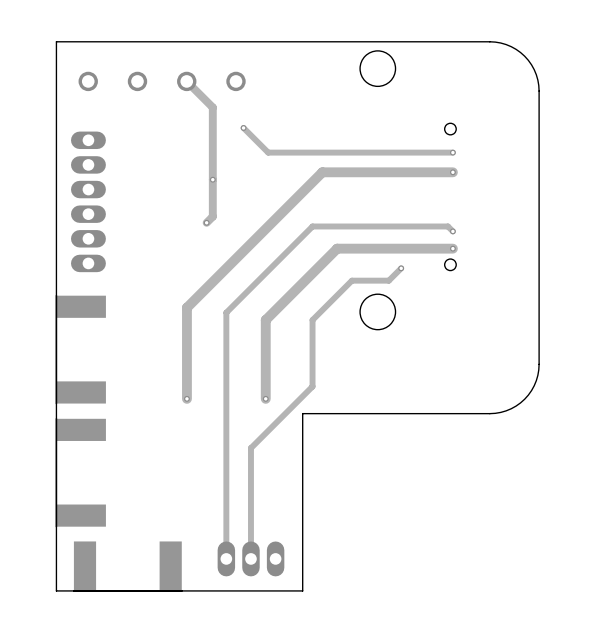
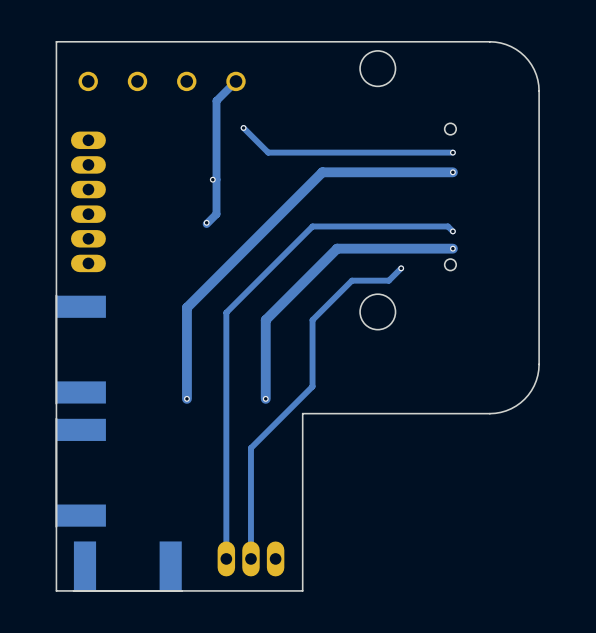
track: (186, 81) (212, 107) (212, 216) (206, 222) -> none
track: none -> (235, 81) (216, 100) (216, 214) (206, 224)

